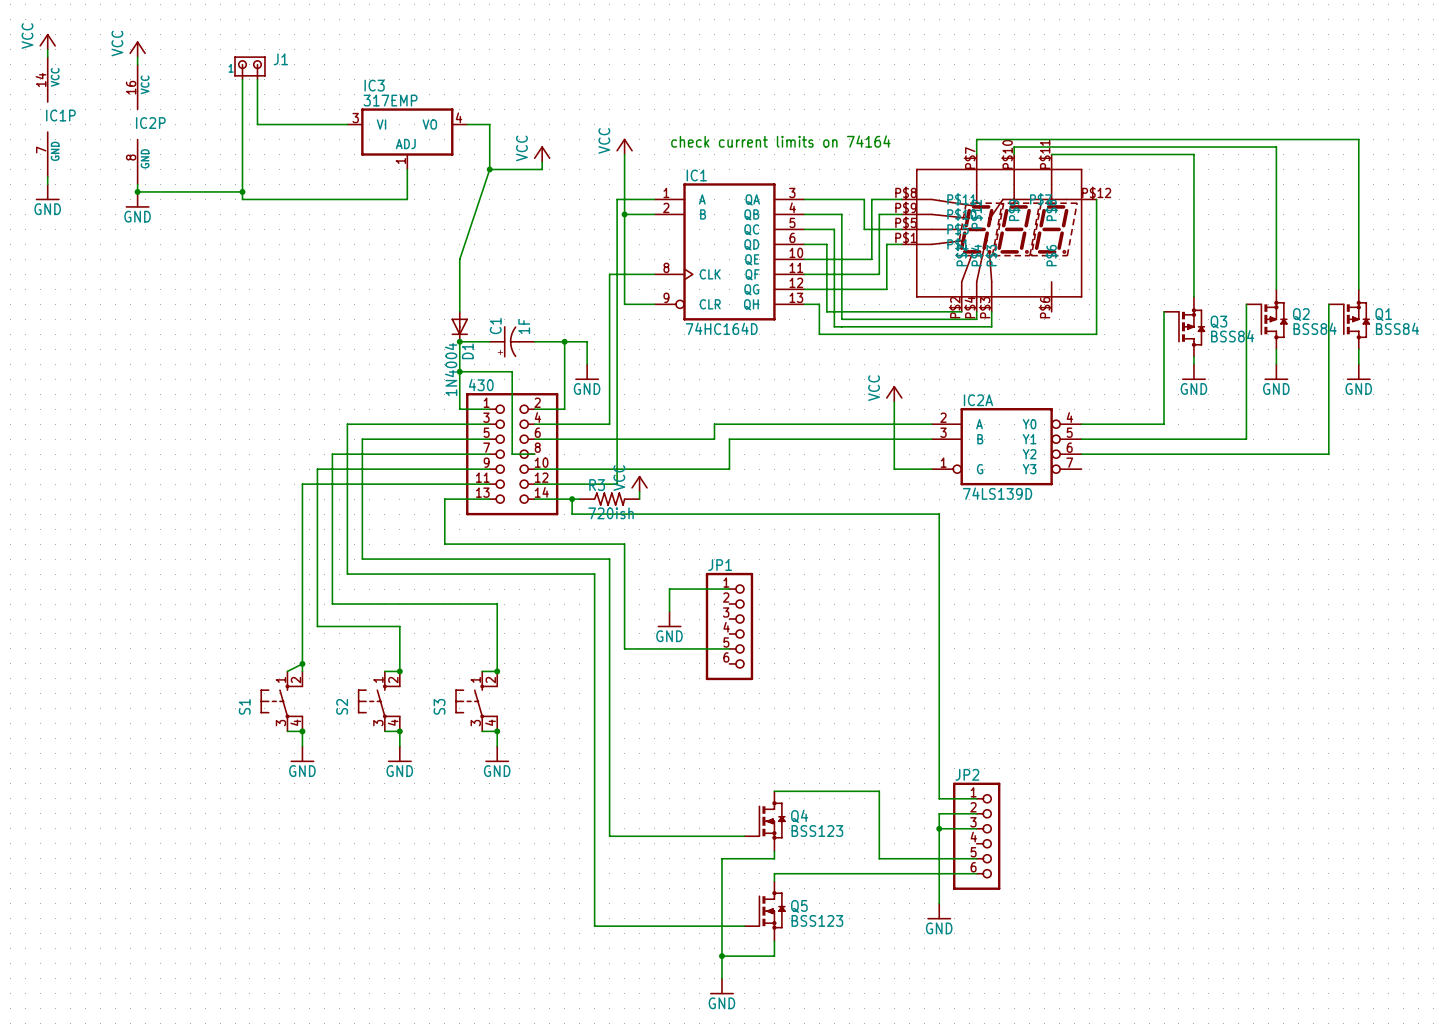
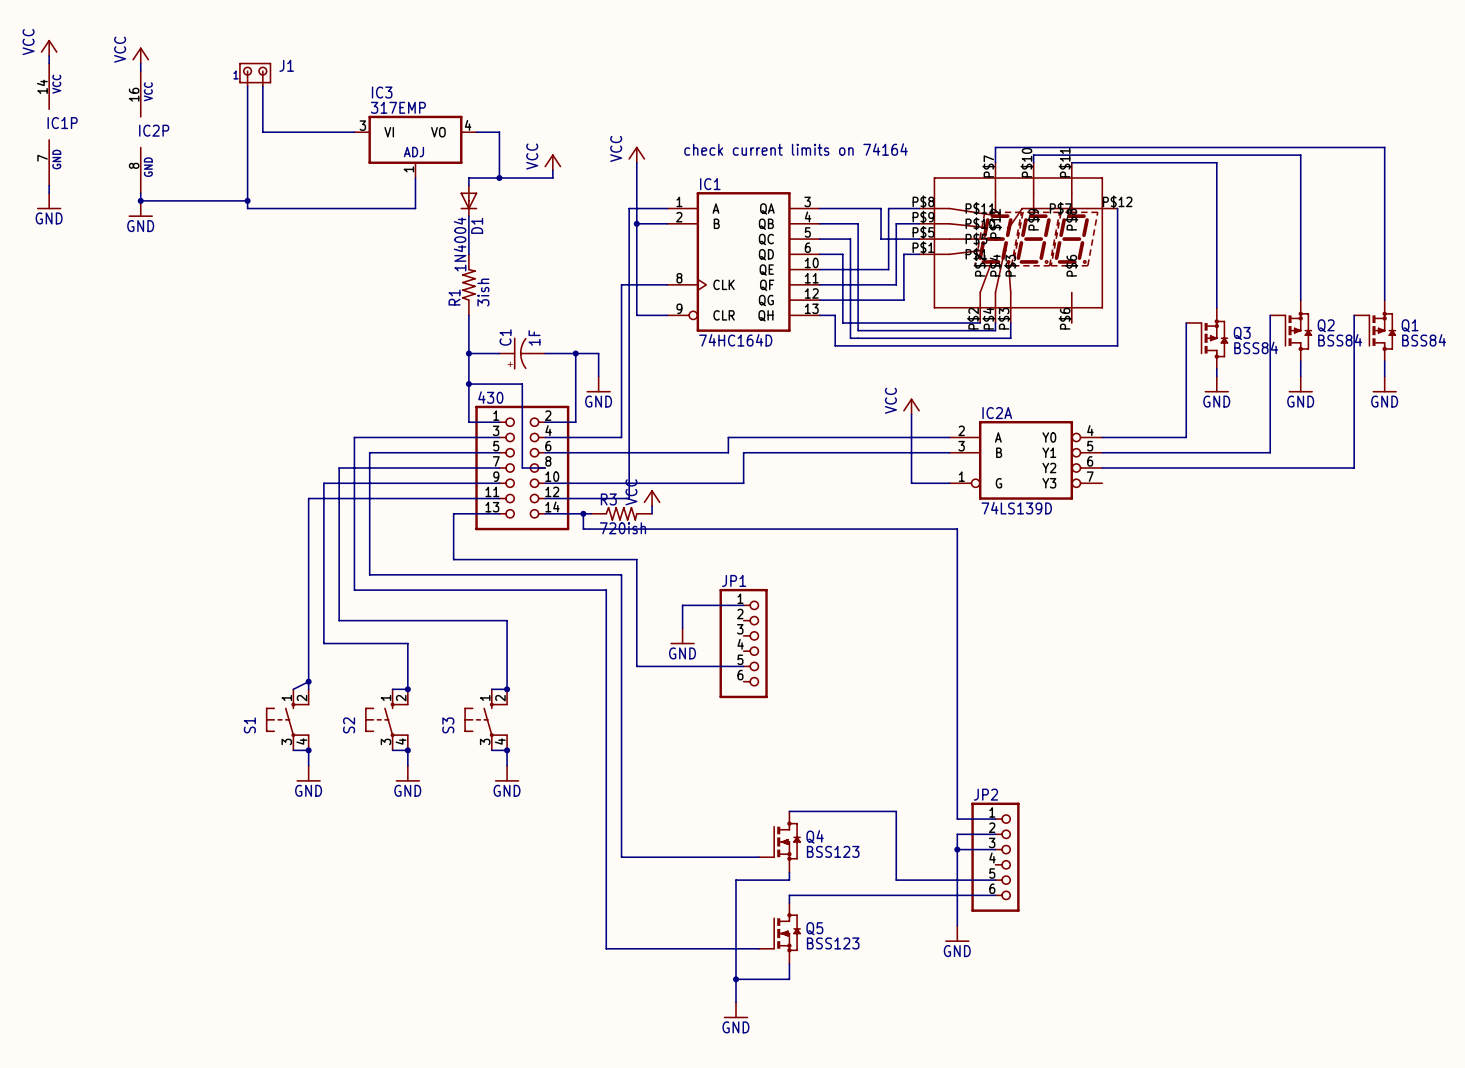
wire: (489, 169) (459, 259) (459, 304) -> (499, 178) (468, 178) (468, 185)
wire: none -> (468, 216) (468, 254)
R1: none -> 3ish (468, 284)
D1 position: (459, 326) -> (468, 200)

